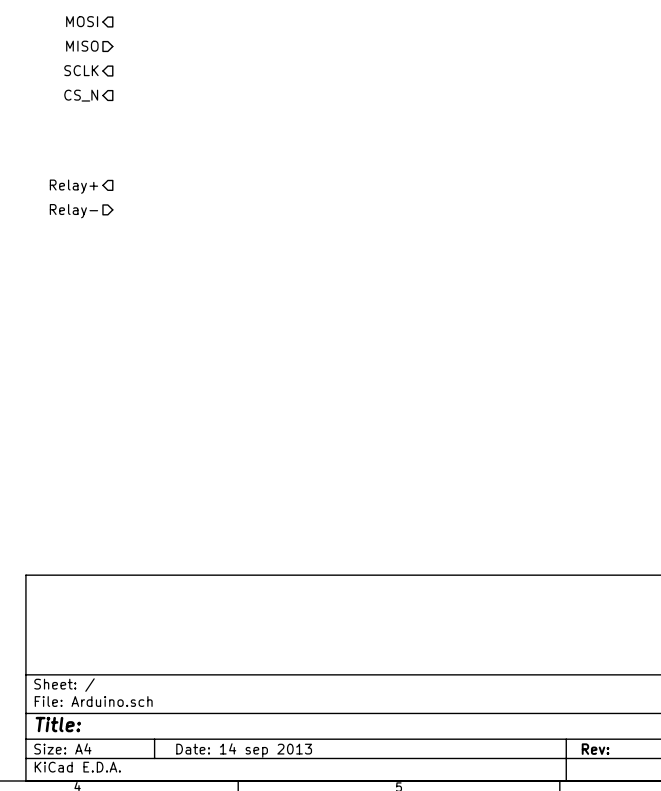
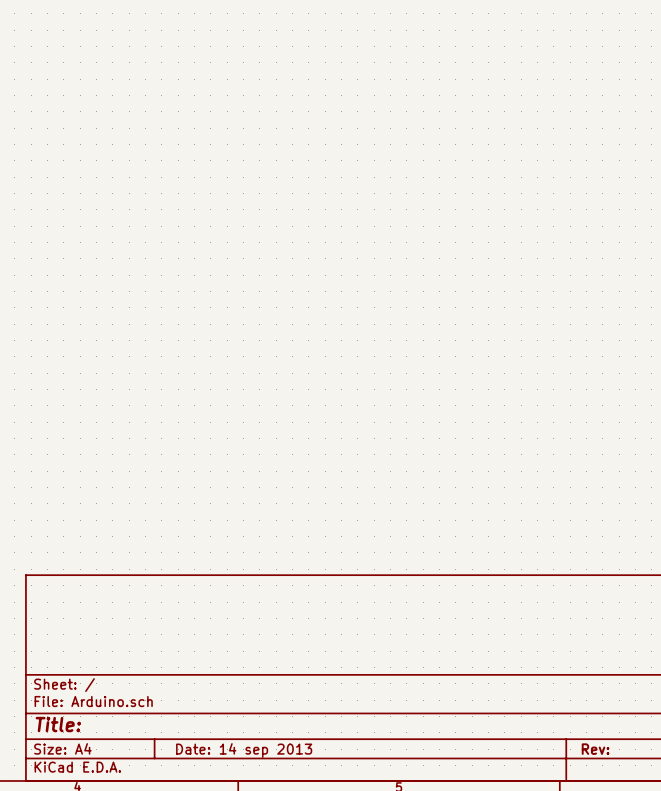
hierarchical label: MOSI (82, 21) -> none
hierarchical label: MISO (82, 46) -> none
hierarchical label: SCLK (81, 70) -> none
hierarchical label: CS_N (81, 95) -> none
hierarchical label: Relay+ (73, 186) -> none
hierarchical label: Relay- (73, 211) -> none

